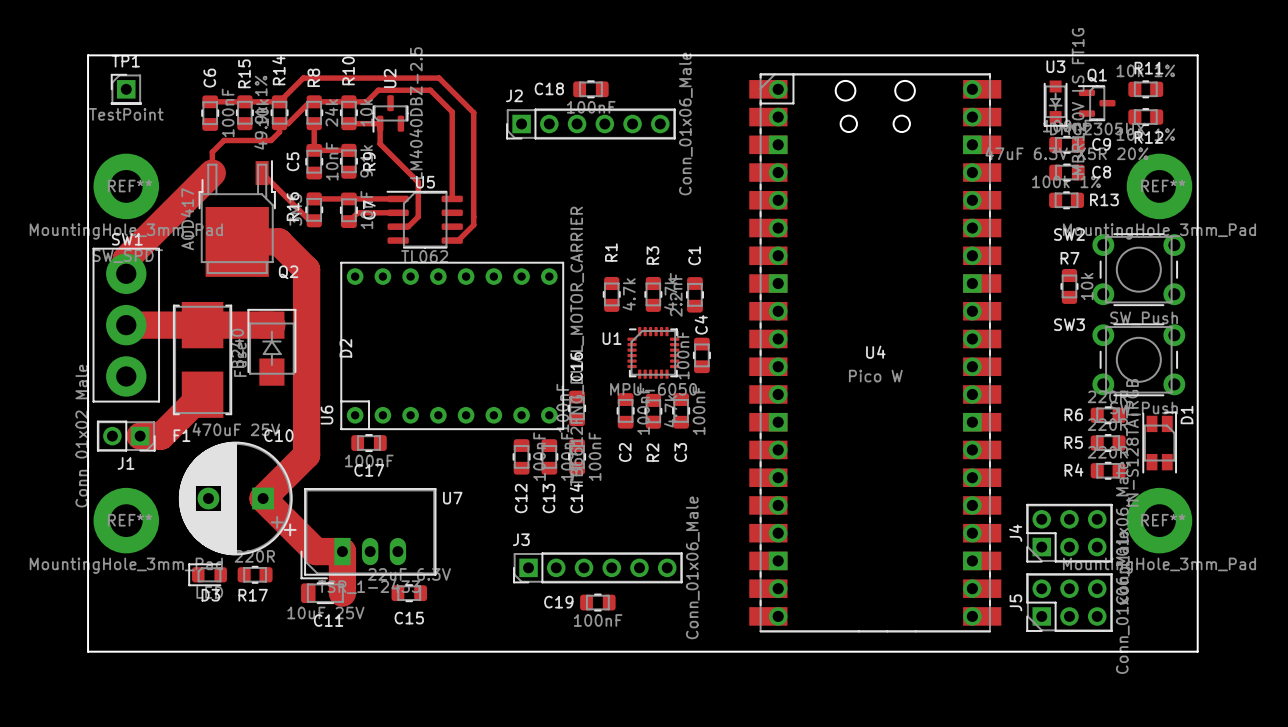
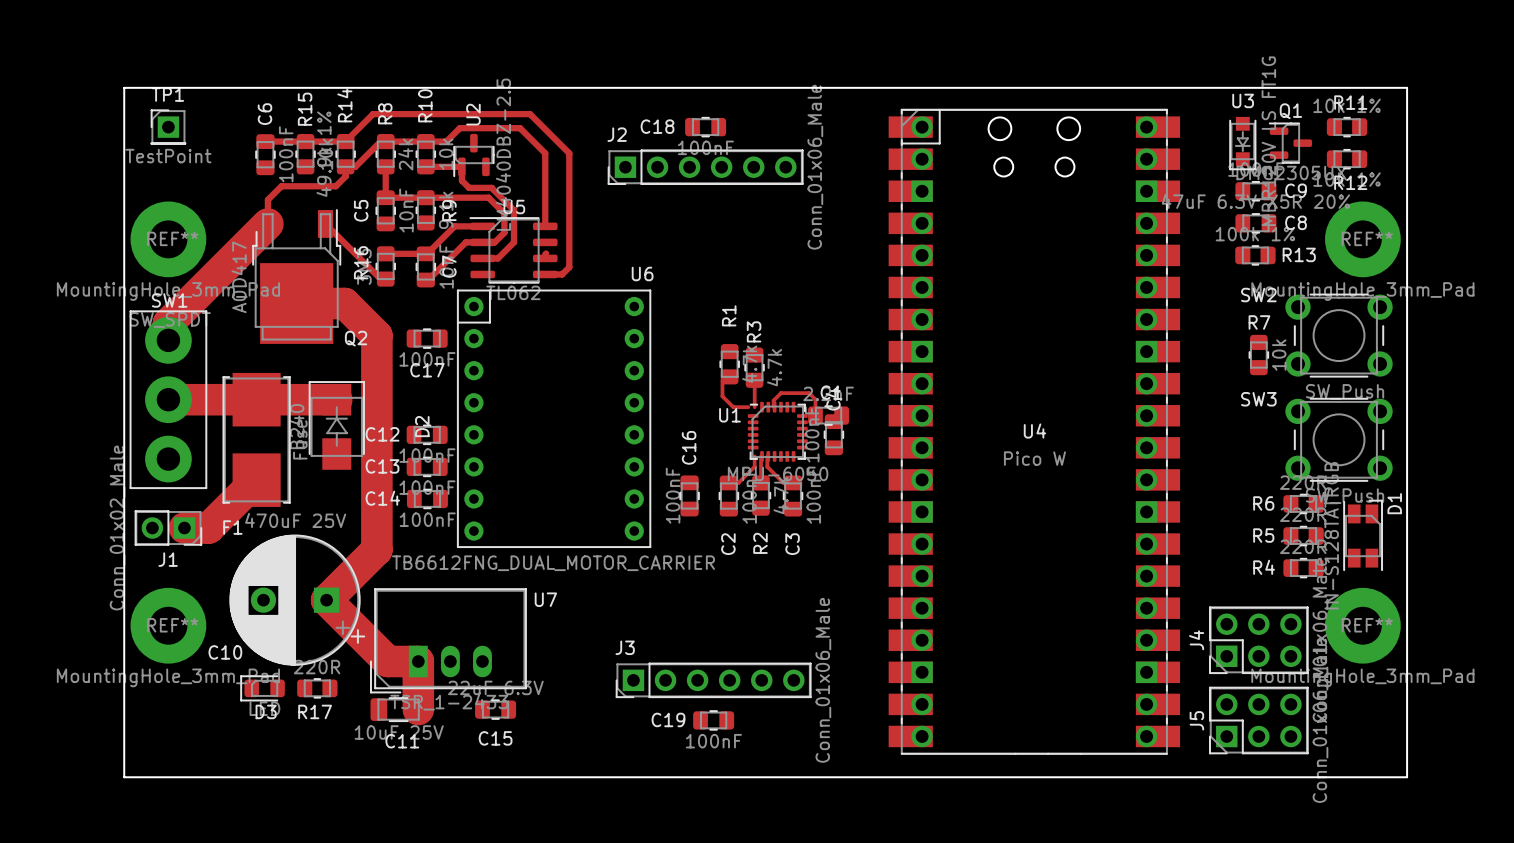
top track: (473, 112) (473, 225) (458, 240) (452, 240) -> (569, 153) (569, 267) (562, 274) (545, 274)
top track: (380, 135) (380, 143) (418, 182) (418, 216) (408, 226) (398, 226) -> (461, 180) (469, 187) (491, 187) (514, 210) (514, 242) (497, 258) (482, 258)
top track: (452, 175) (452, 198) -> none
top track: (350, 198) (398, 198) -> (427, 253) (454, 226) (482, 226)
top track: (398, 212) (357, 212) (348, 221) -> (425, 197) (488, 197) (504, 213) (504, 232) (494, 242) (465, 242) (428, 280) (425, 280)
U5 position: (424, 219) -> (513, 250)
R3 name position: R3 (652, 255) -> R3 (754, 331)
R3 position: (653, 294) -> (754, 367)
C1 rotation: 0° (694, 294) -> 90° clockwise (828, 415)
C1 position: (694, 294) -> (828, 415)
top track: none -> (722, 380) (722, 396) (733, 407) (748, 407)
top track: none -> (754, 380) (754, 407)
top track: none -> (773, 407) (773, 400) (781, 393) (809, 393) (815, 399) (815, 415)
U6 rotation: 0° (452, 345) -> 90° clockwise (554, 418)
top track: none -> (754, 456) (754, 466) (738, 482) (728, 482)
top track: none -> (761, 456) (761, 482)
top track: none -> (767, 456) (767, 466) (783, 482) (793, 482)
C2 position: (625, 410) -> (728, 496)
C3 position: (681, 410) -> (793, 496)
R2 position: (653, 411) -> (760, 495)
U6 name position: U6 (326, 415) -> U6 (642, 273)
C10 name position: C10 (278, 435) -> C10 (225, 652)
C17 position: (369, 443) -> (427, 338)
C12 rotation: 0° (521, 456) -> 90° clockwise (427, 434)
C12 position: (521, 456) -> (427, 434)
C13 rotation: 0° (549, 456) -> 90° clockwise (427, 466)
C13 position: (549, 456) -> (427, 466)
C14 rotation: 0° (577, 456) -> 90° clockwise (427, 498)
C14 position: (577, 456) -> (427, 498)

